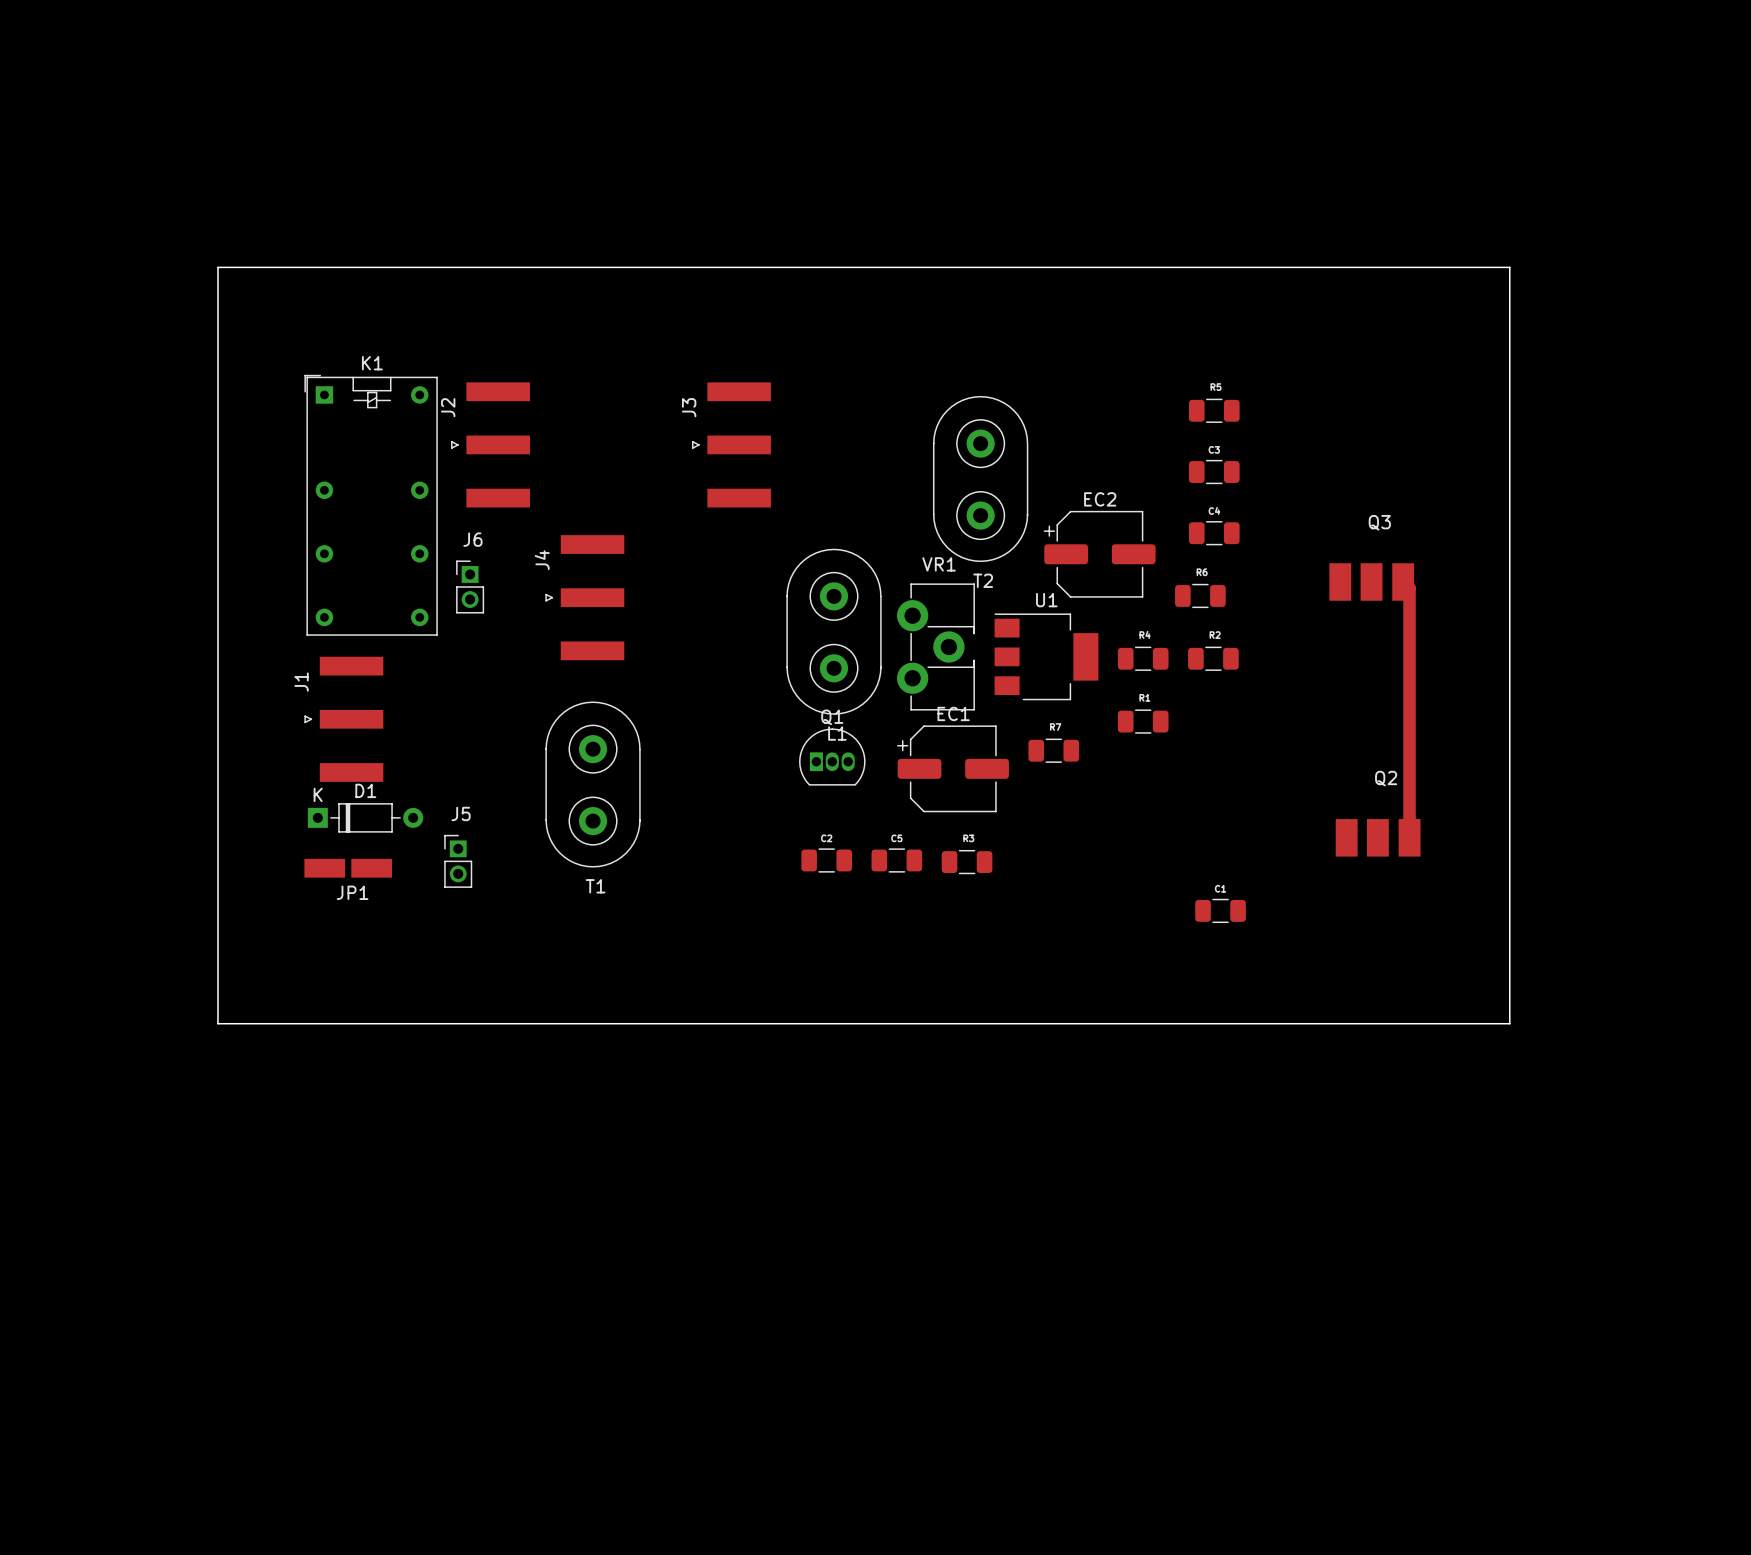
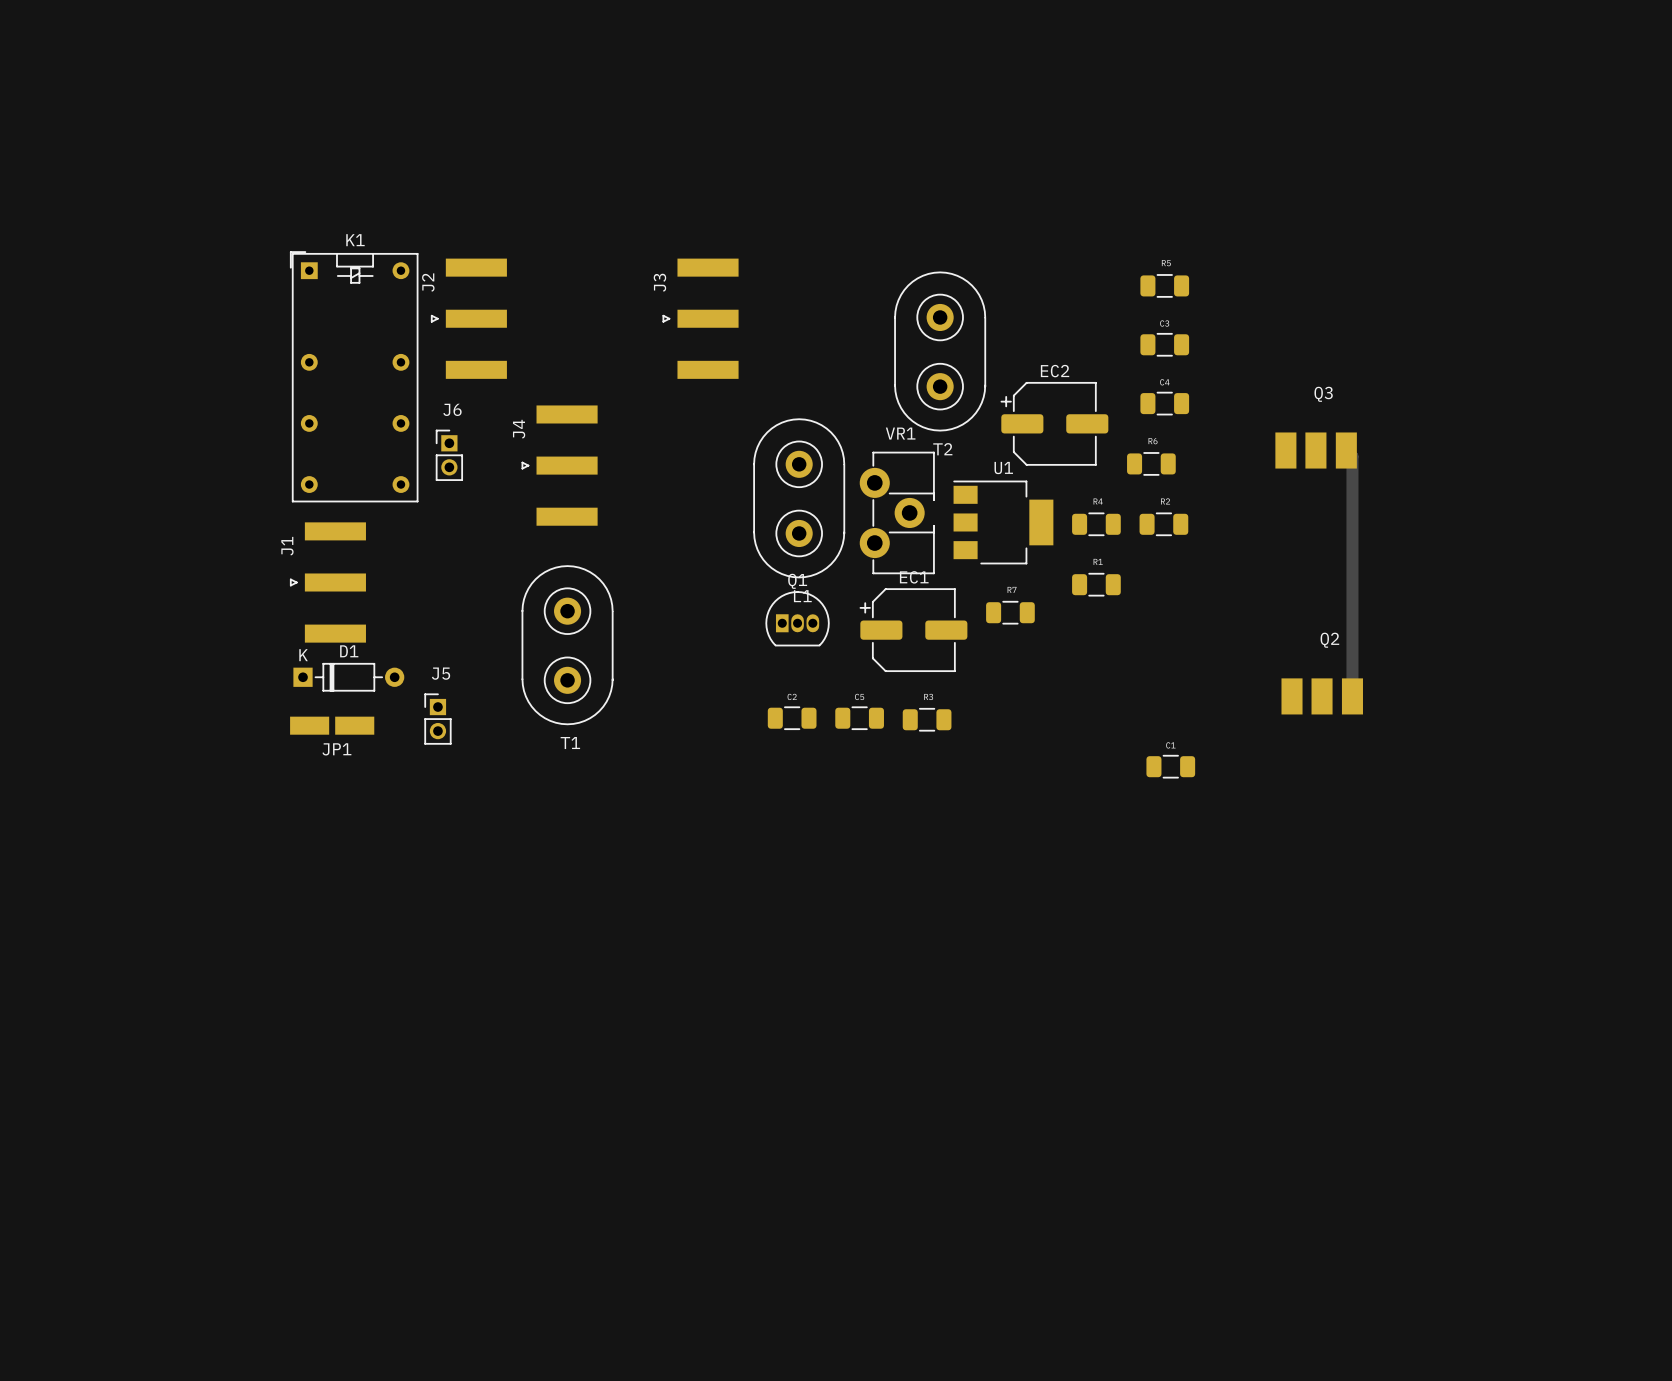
board edge: (217, 267) (1509, 267) (1509, 1023) (217, 1023) (217, 267) -> none

